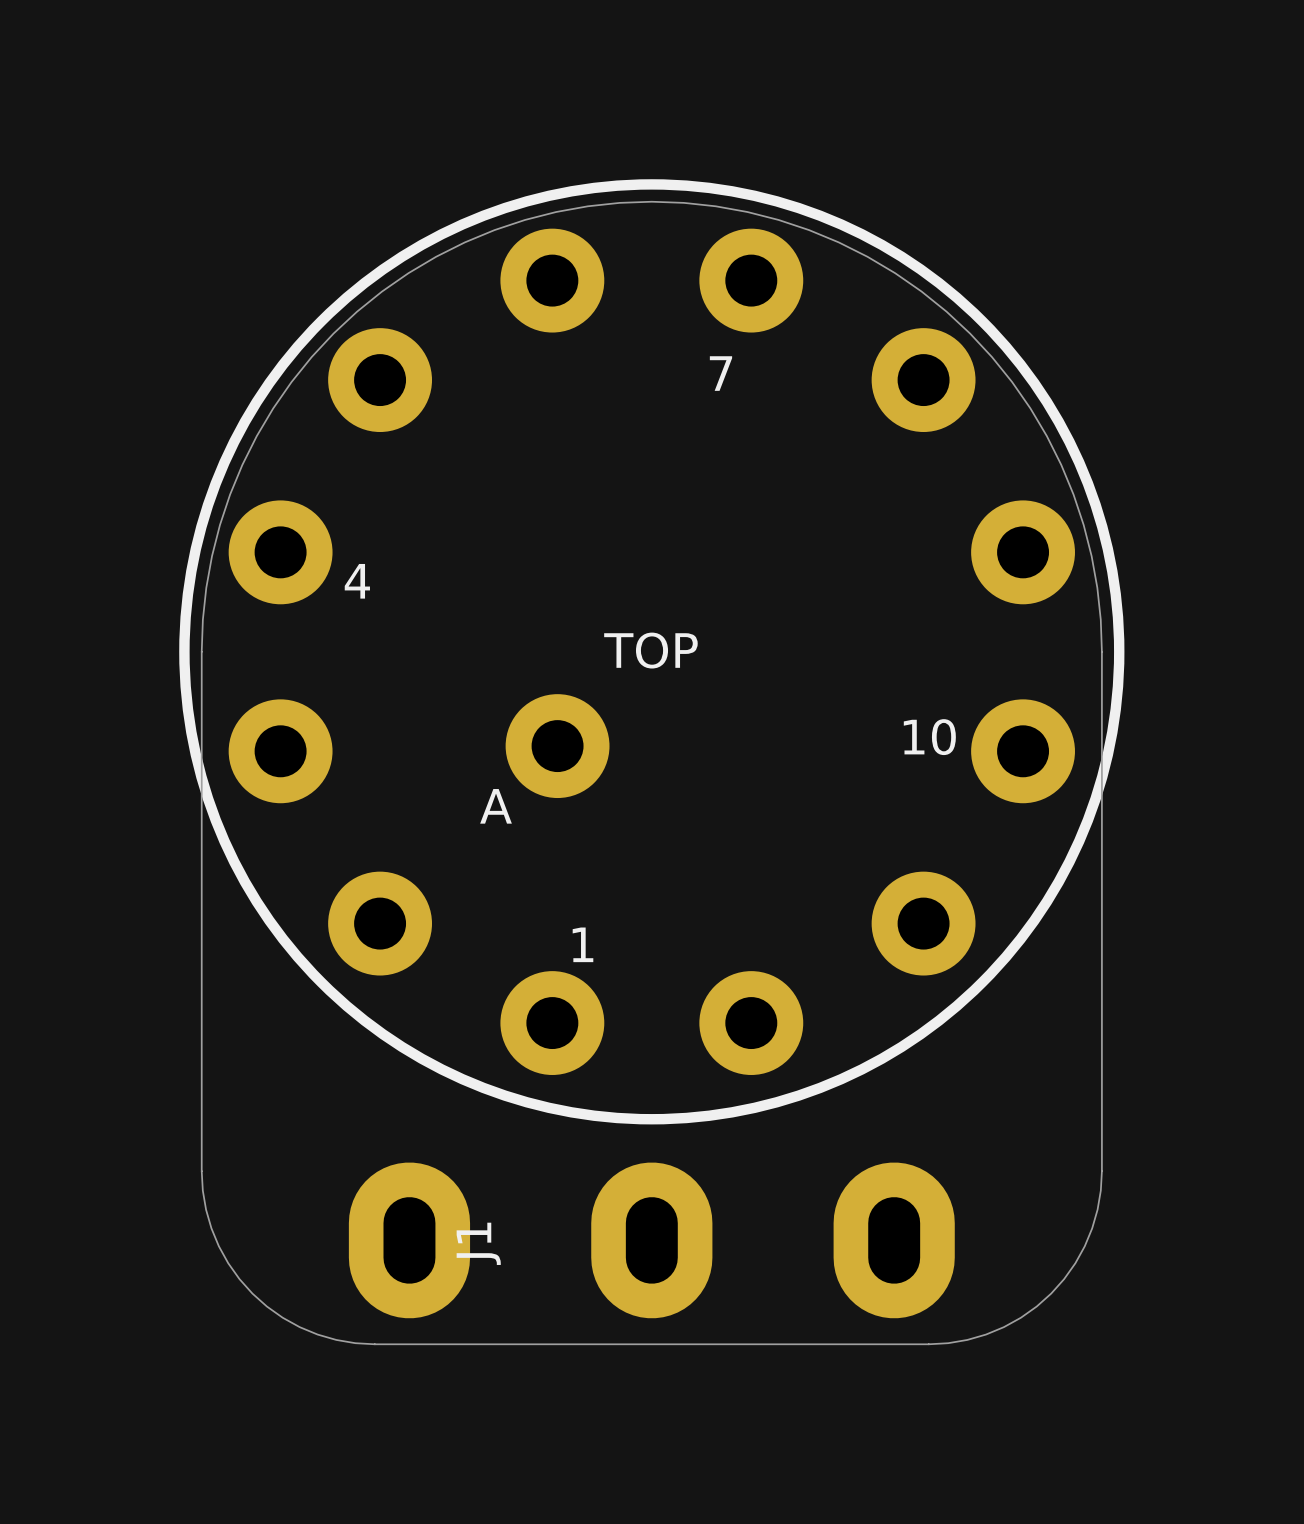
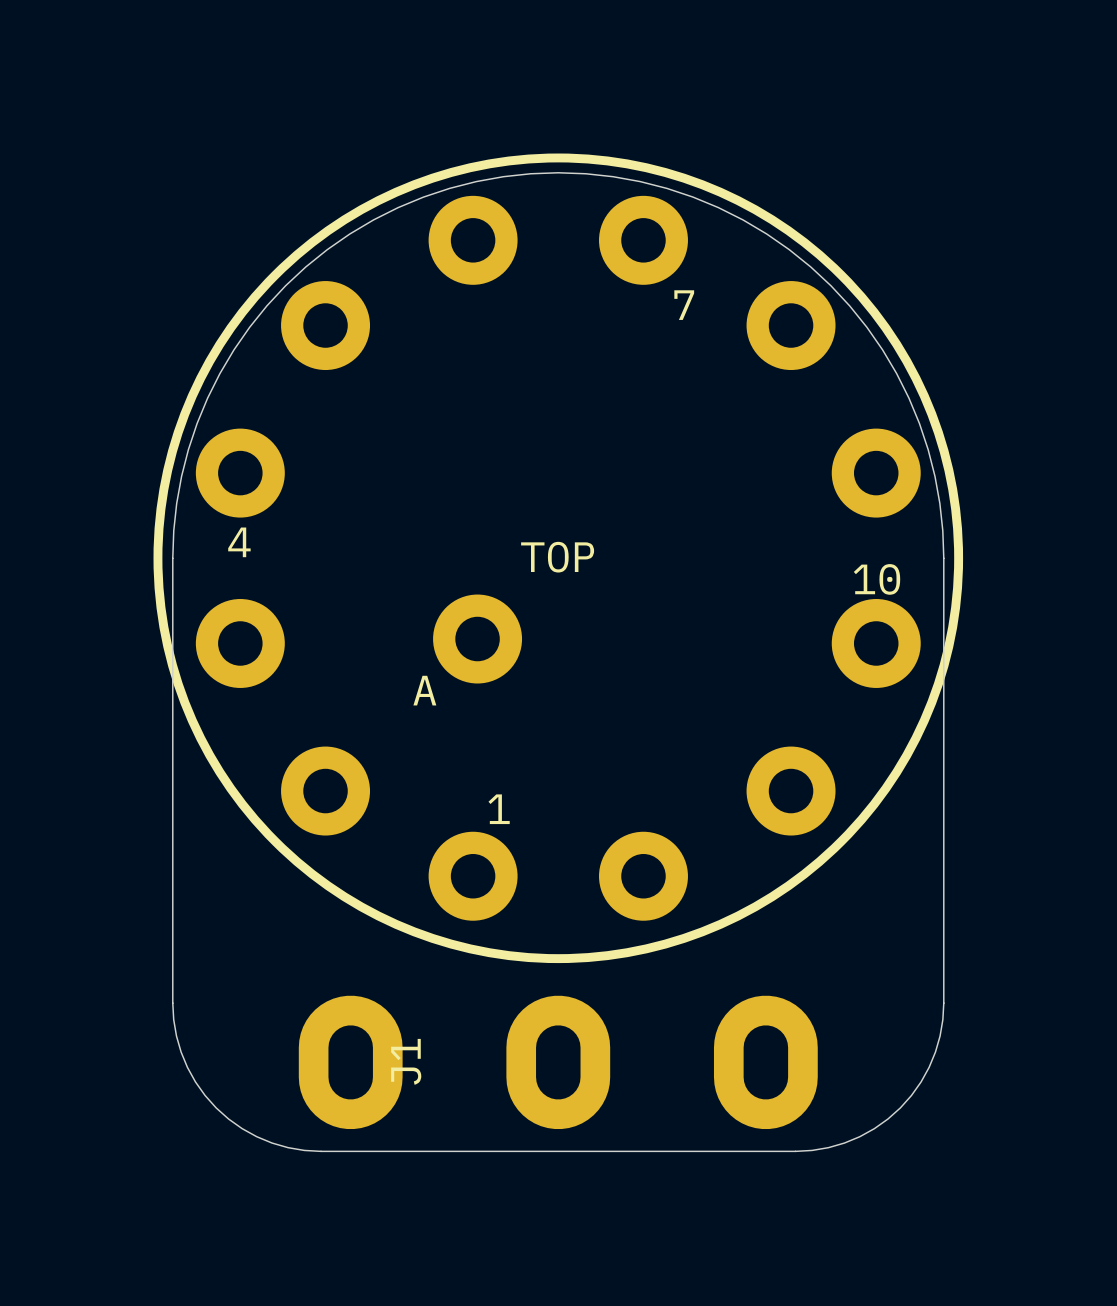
part text position: 7 (720, 373) -> 7 (684, 305)
part text position: 4 (357, 581) -> 4 (239, 542)
part text position: 10 (929, 737) -> 10 (877, 579)

